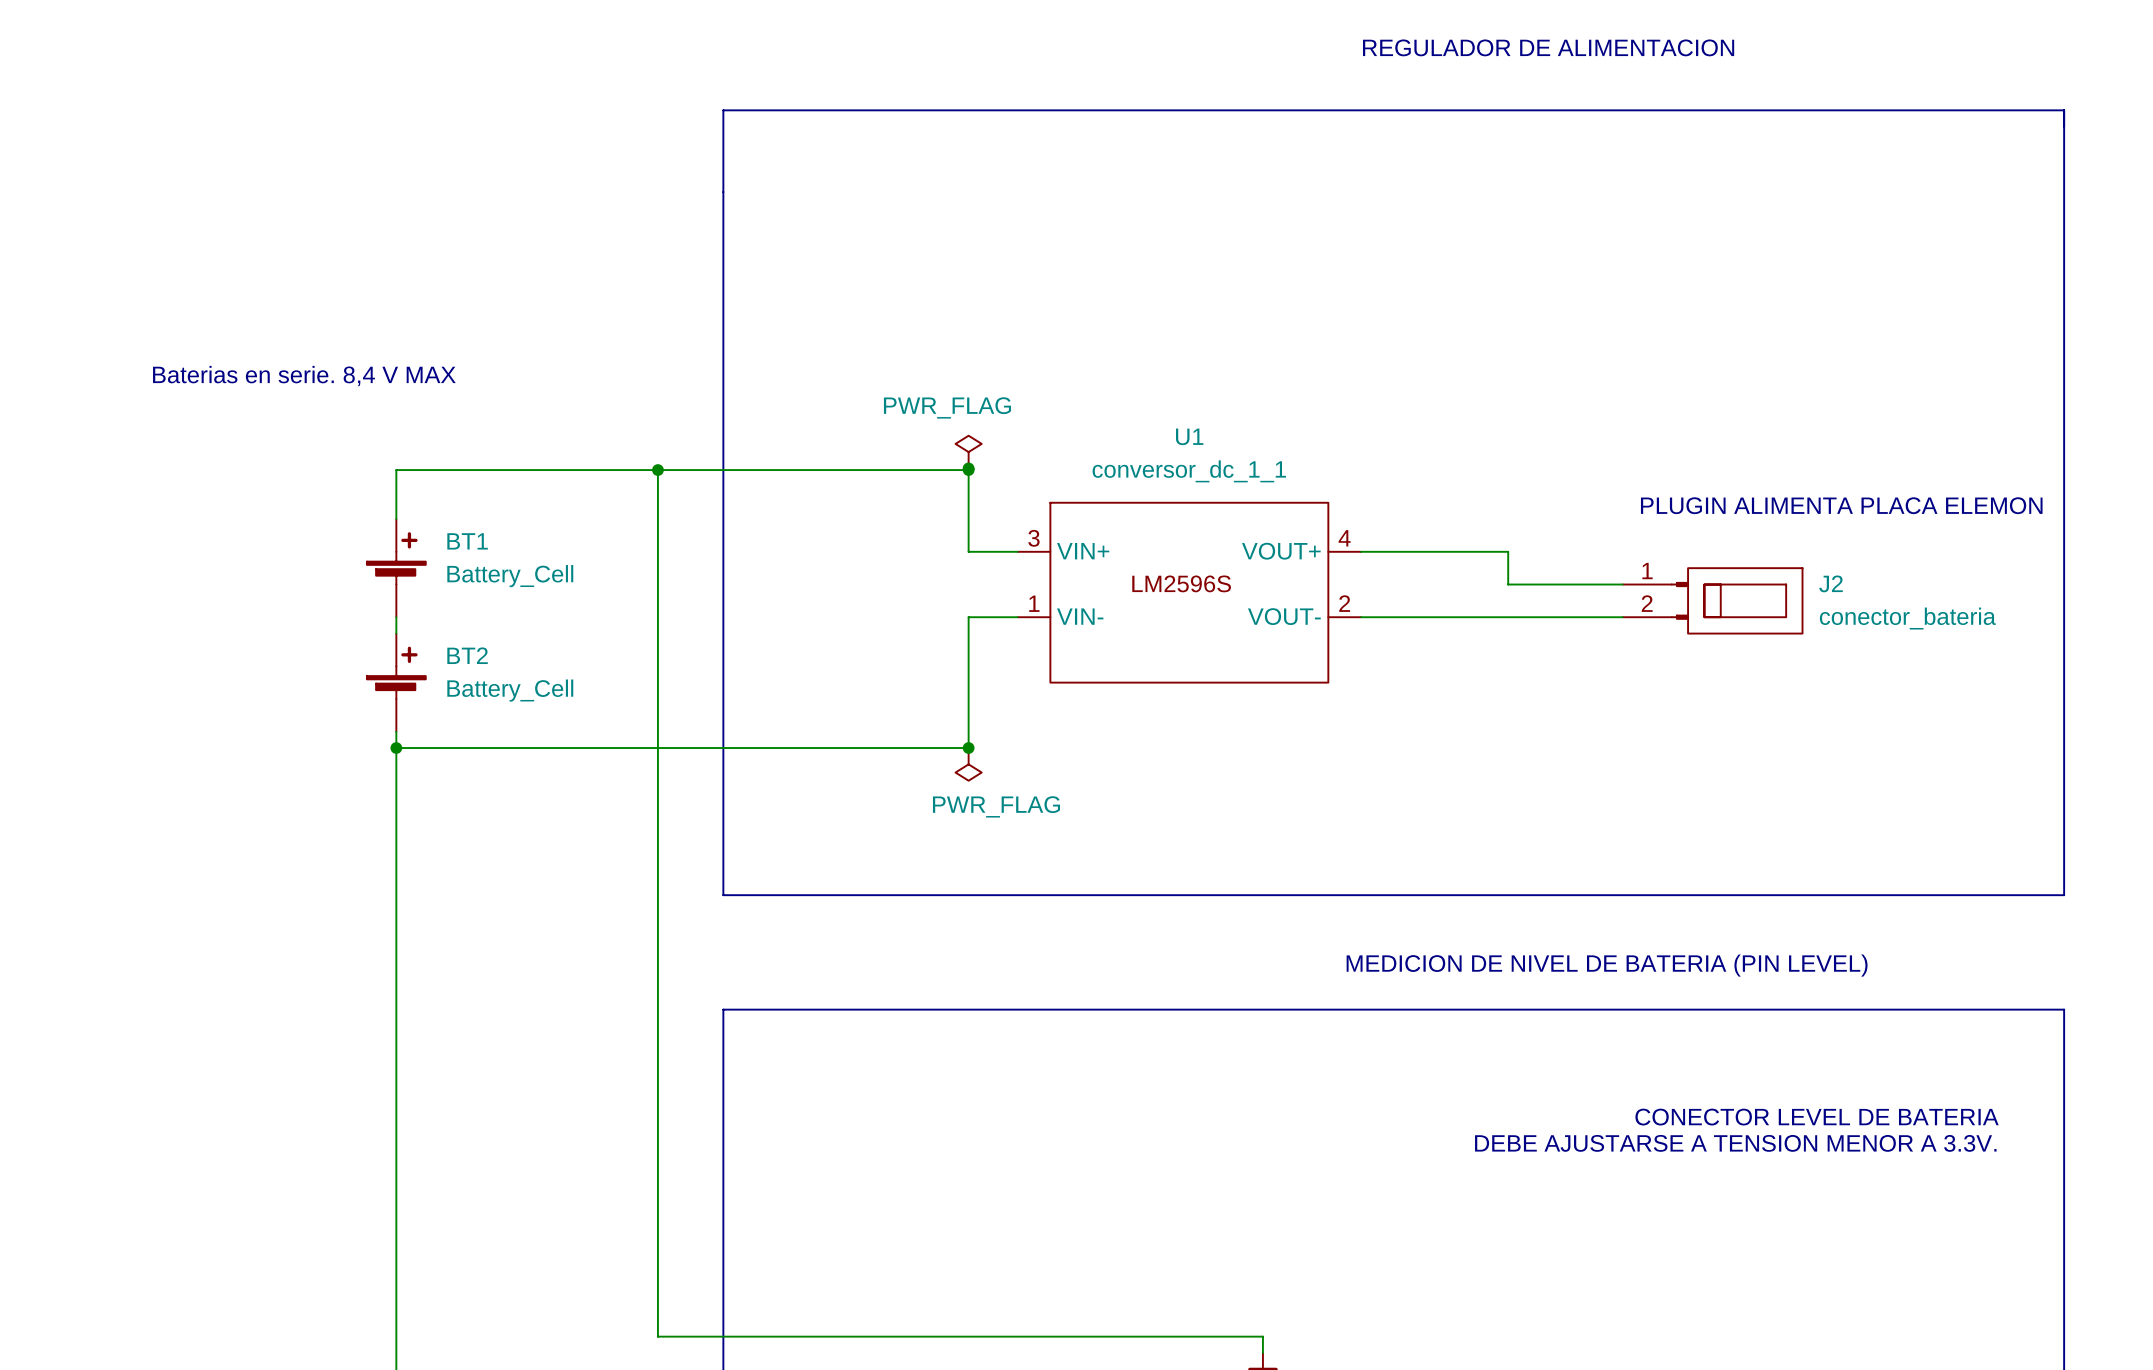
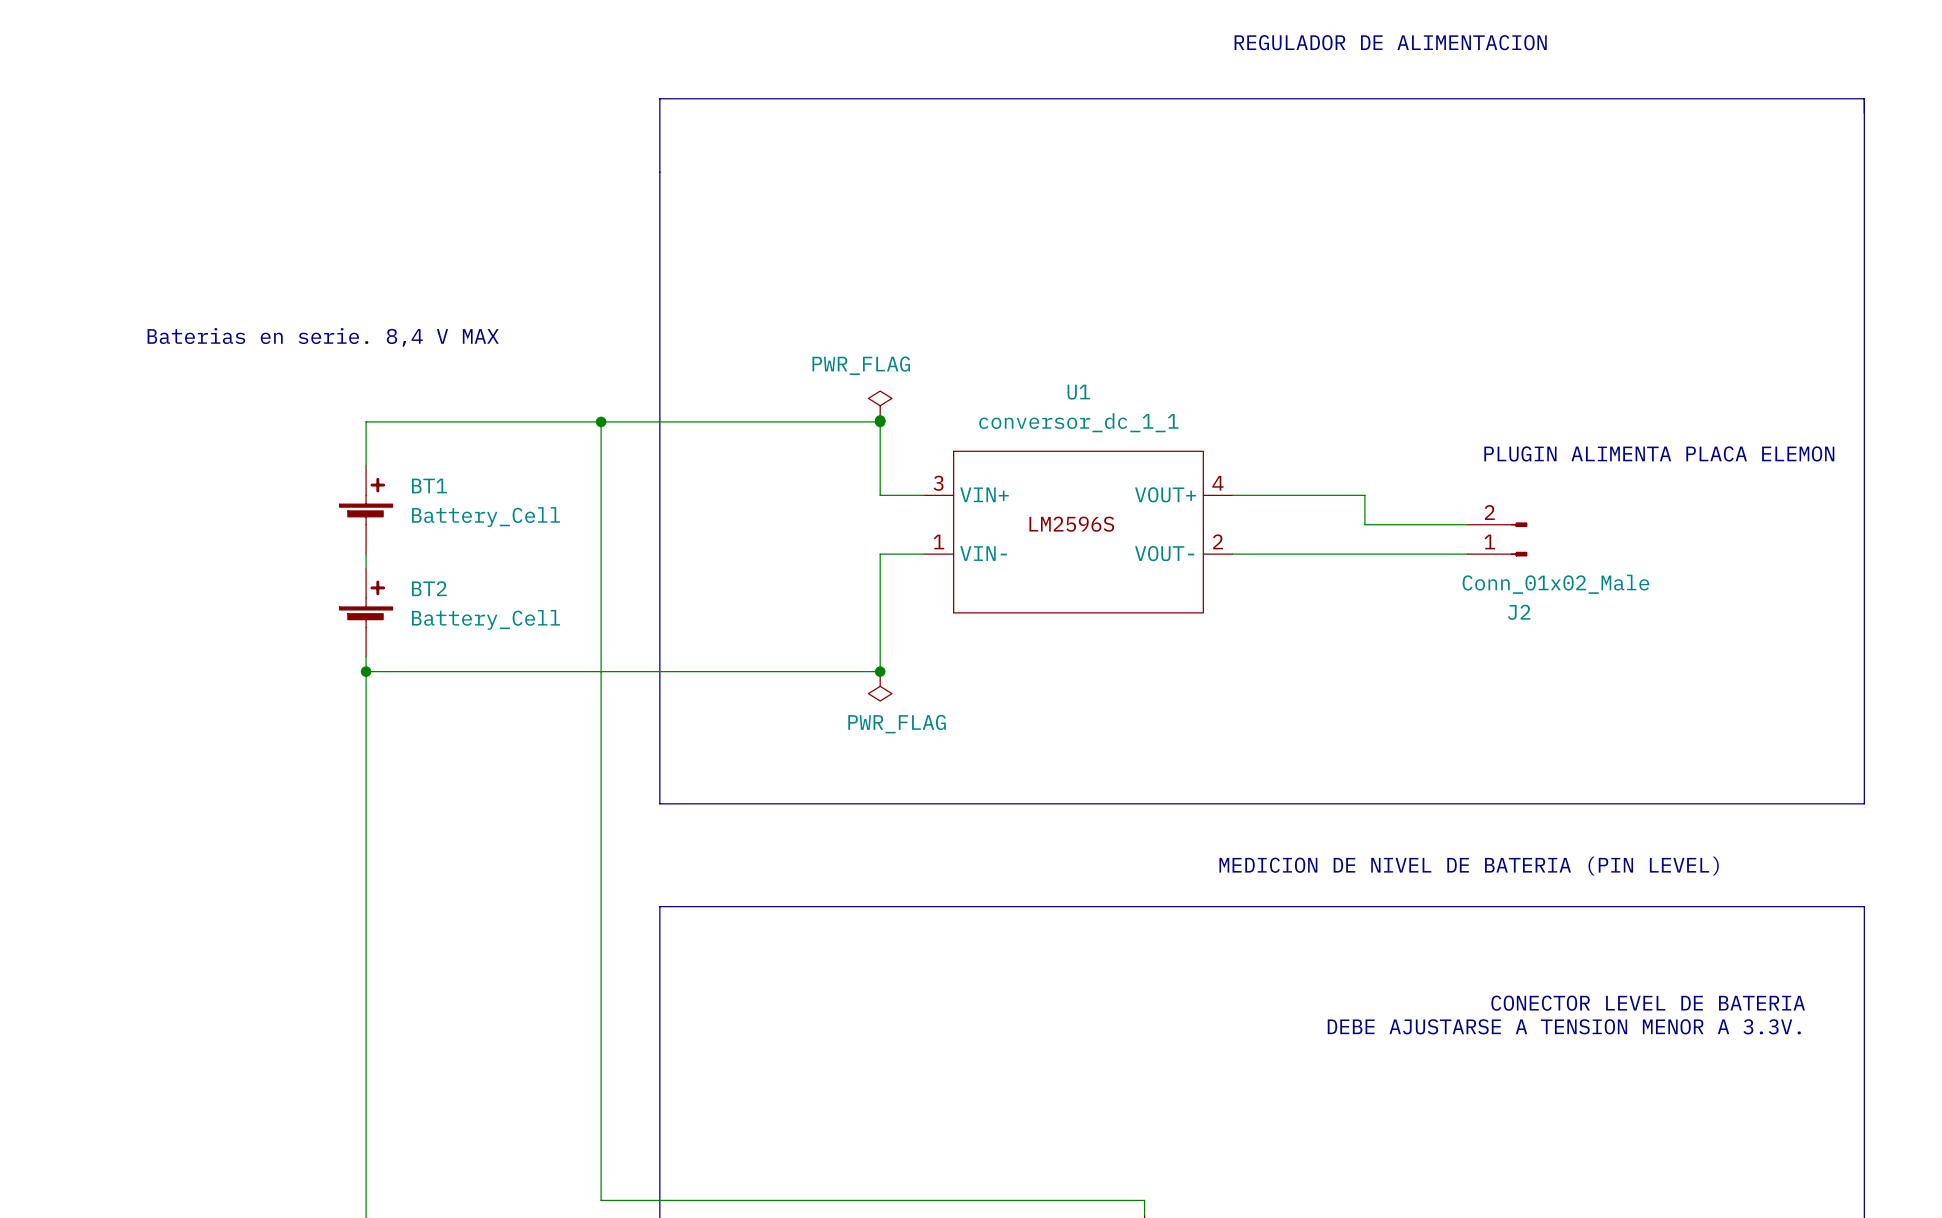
J2 symbol: [1622, 568, 1803, 634] -> [1467, 522, 1528, 557]
J2 name position: J2 (1831, 583) -> J2 (1519, 612)
J2 value: conector_bateria (1907, 618) -> Conn_01x02_Male (1555, 584)

